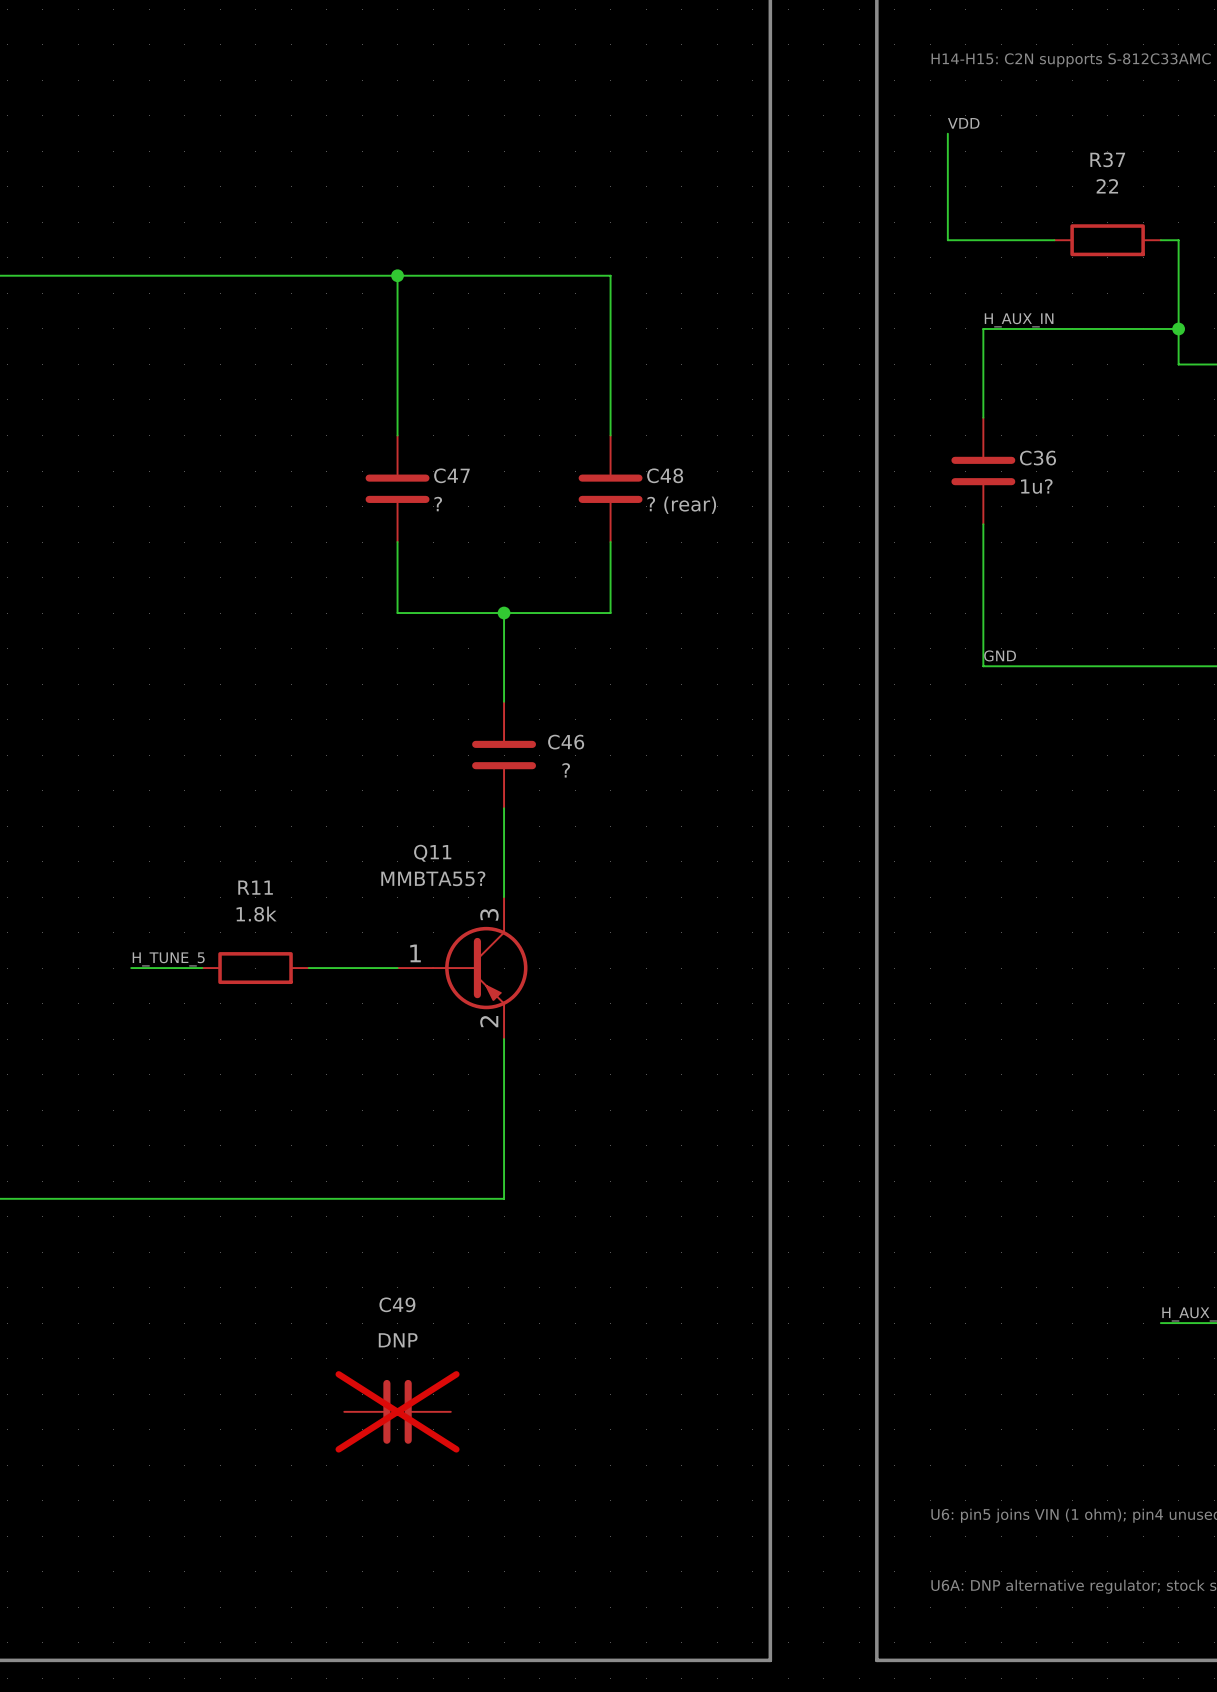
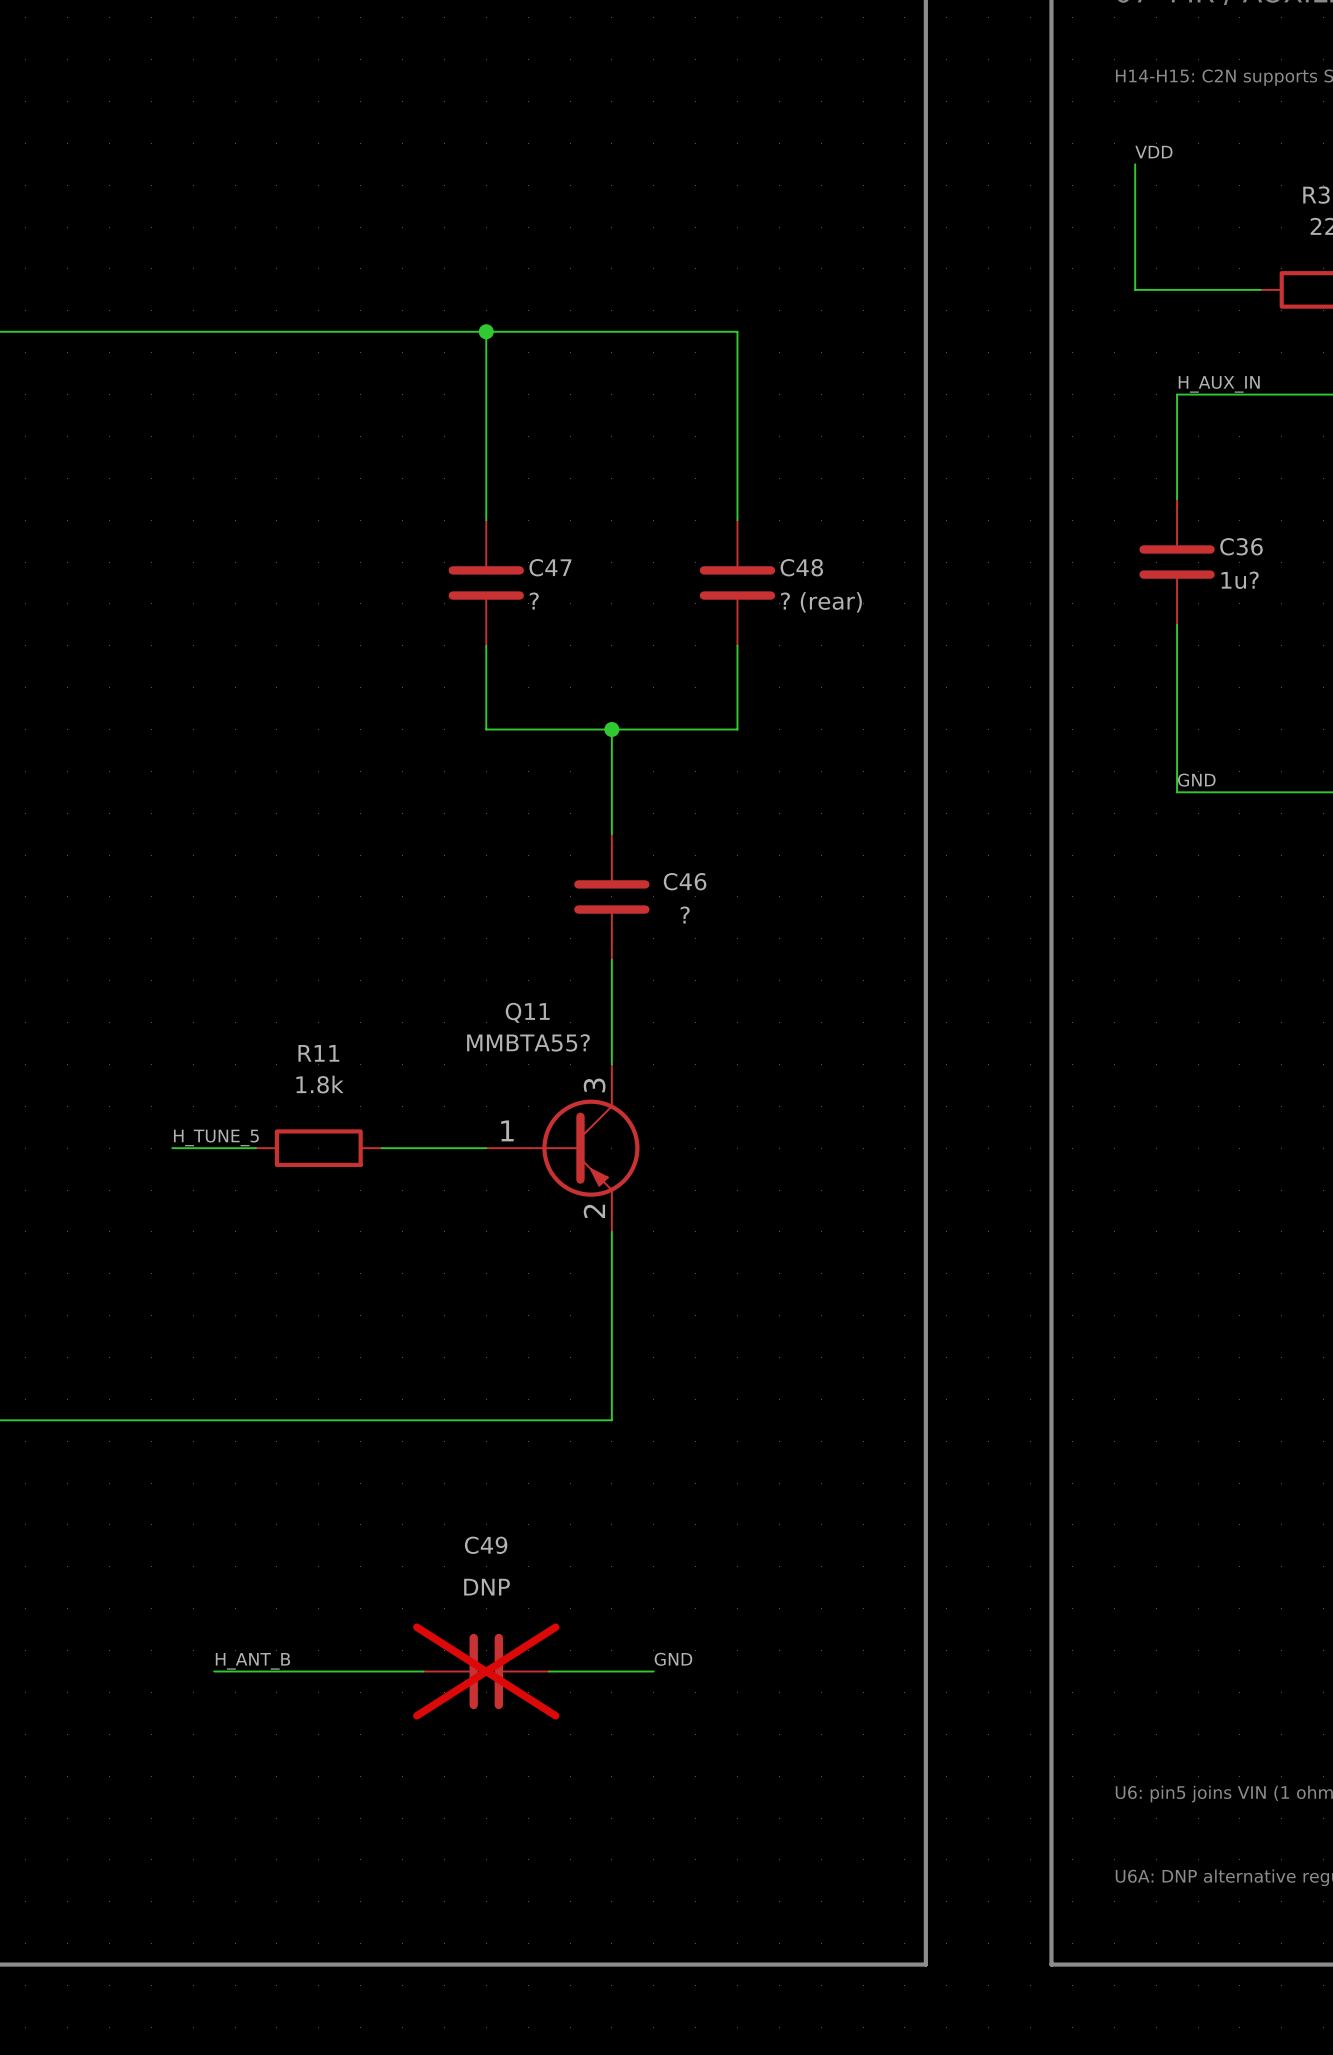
label: none -> GND (673, 1659)
label: none -> H_ANT_B (252, 1661)
wire: none -> (214, 1671) (423, 1671)
wire: none -> (549, 1671) (653, 1671)

